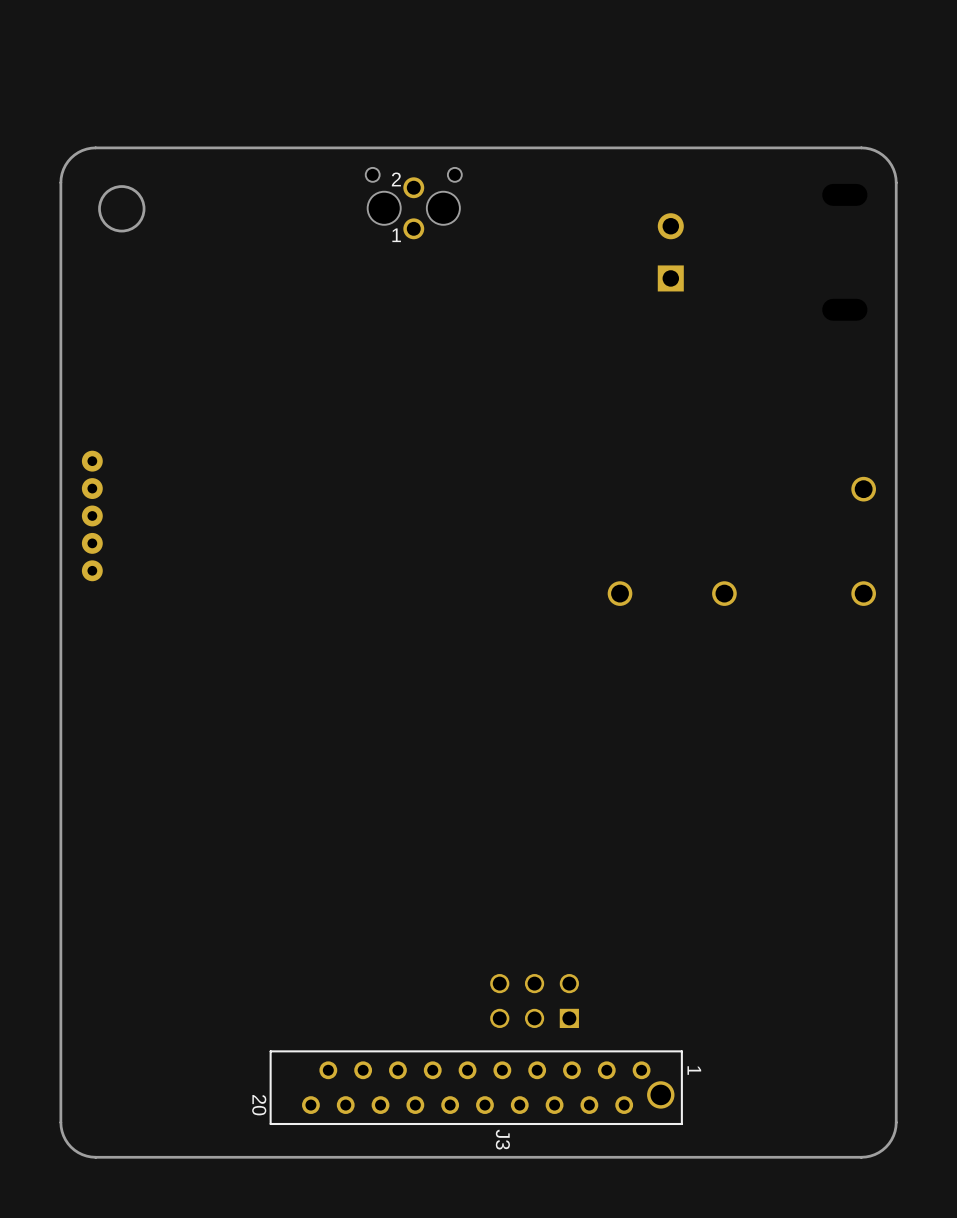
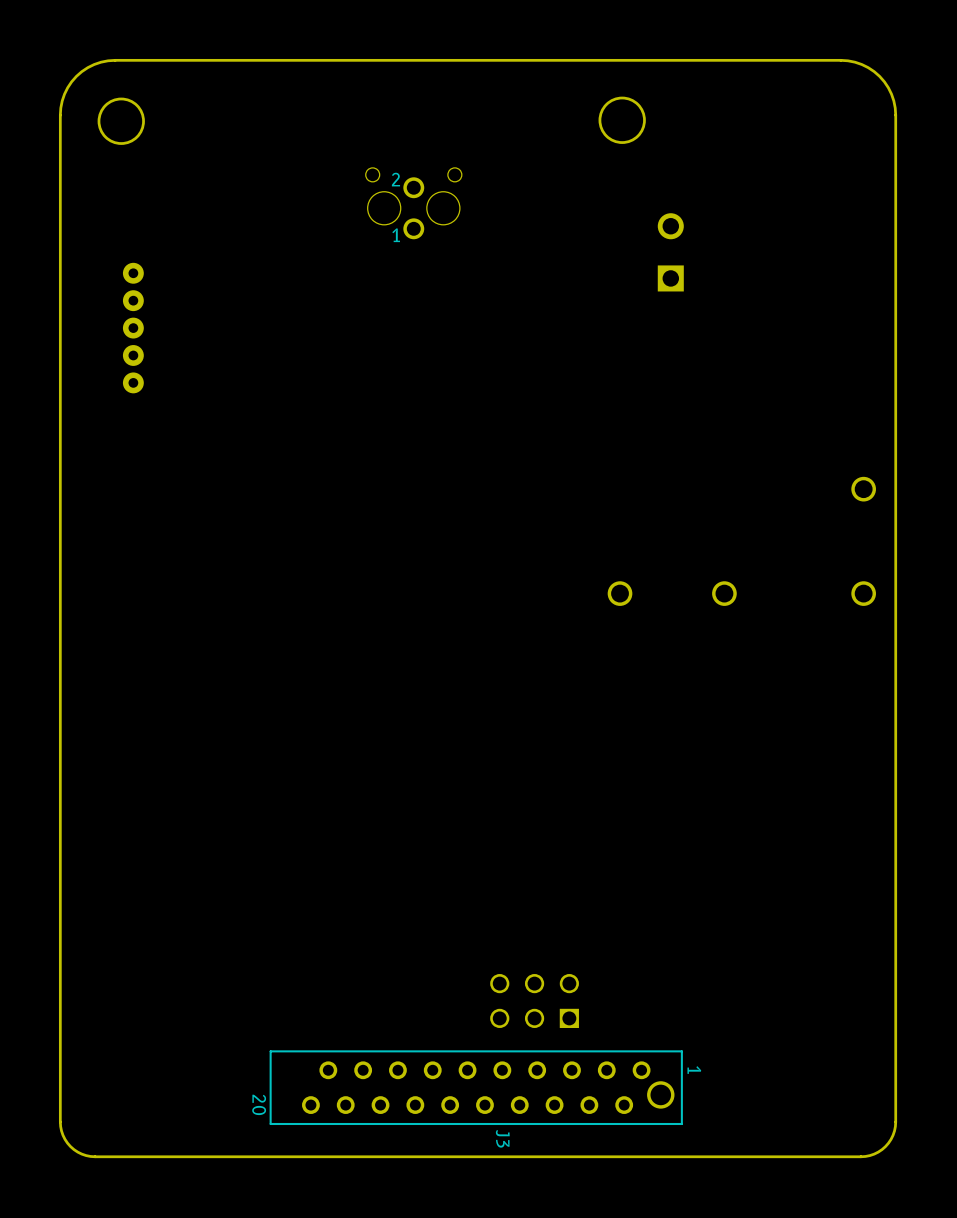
round board edge: none -> [598, 96, 646, 144]
board edge: (861, 147) (95, 147) (82, 150) (68, 161) (62, 173) (60, 182) (60, 1122) (63, 1135) (74, 1150) (86, 1156) (95, 1157) (861, 1157) (874, 1154) (889, 1143) (895, 1131) (896, 1122) (896, 182) (893, 169) (886, 158) (874, 150) (861, 147) -> (840, 60) (861, 64) (879, 76) (891, 94) (895, 115) (895, 1121) (894, 1130) (888, 1143) (874, 1154) (860, 1156) (95, 1156) (86, 1155) (73, 1149) (62, 1135) (60, 1121) (60, 115) (62, 100) (71, 81) (81, 71) (94, 64) (115, 60) (840, 60)
round board edge position: (121, 208) -> (121, 121)
part position: (92, 515) -> (133, 328)

